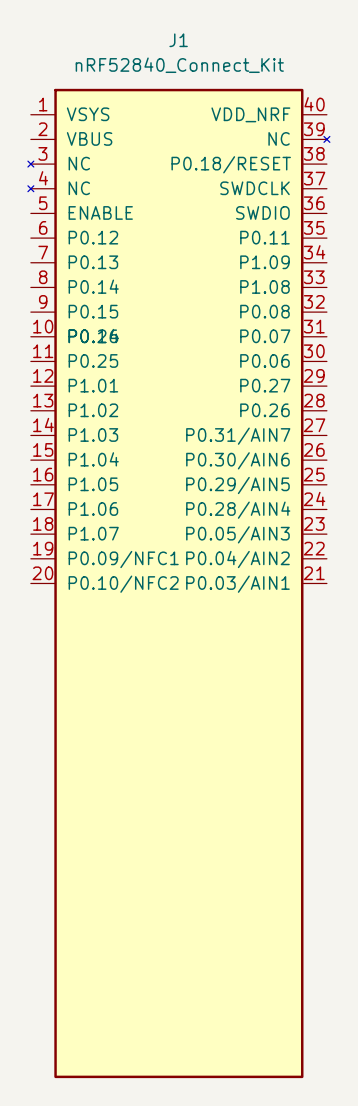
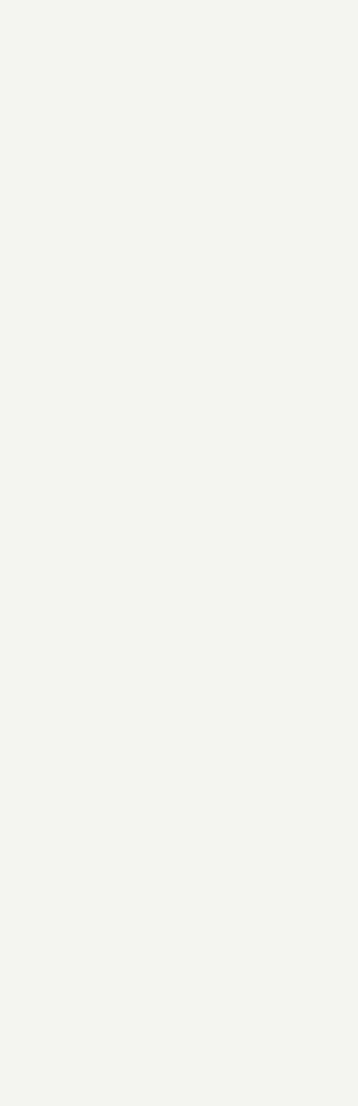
J1: nRF52840_Connect_Kit (178, 583) -> none

